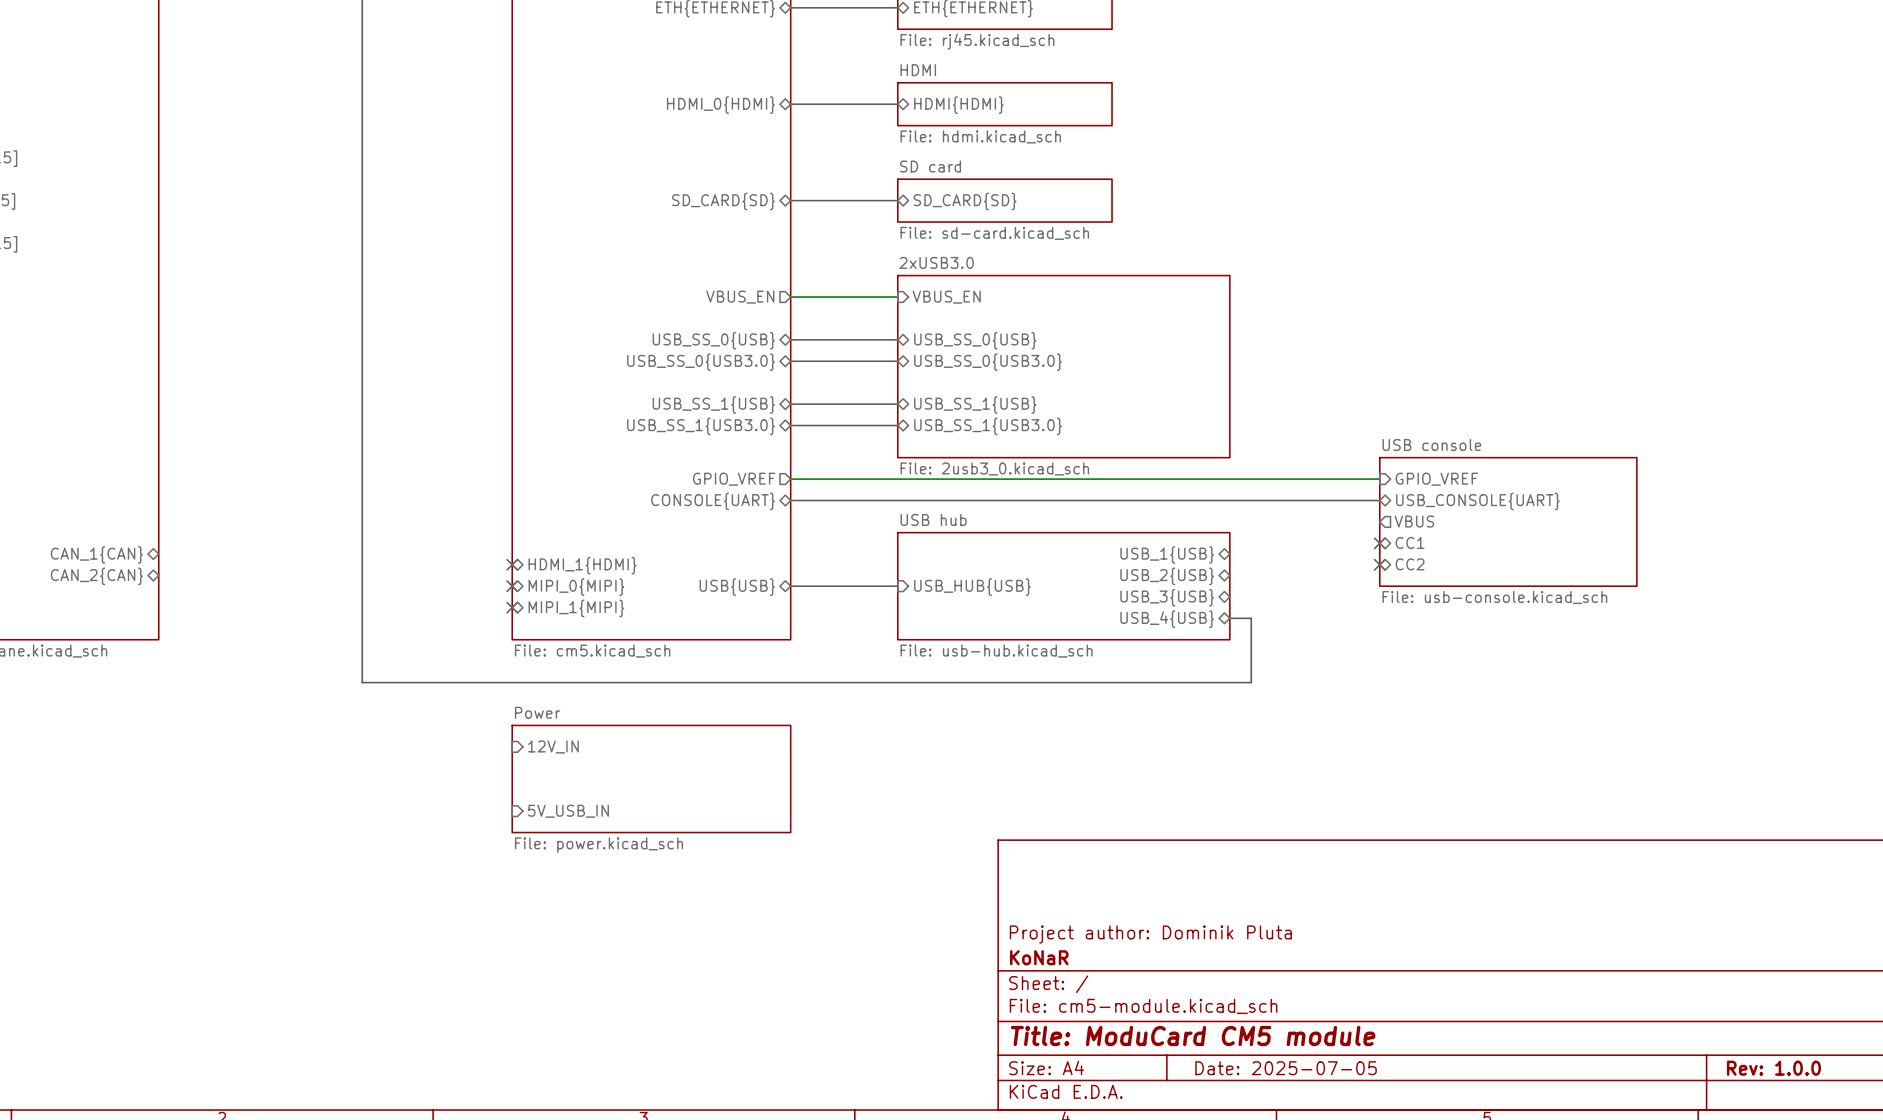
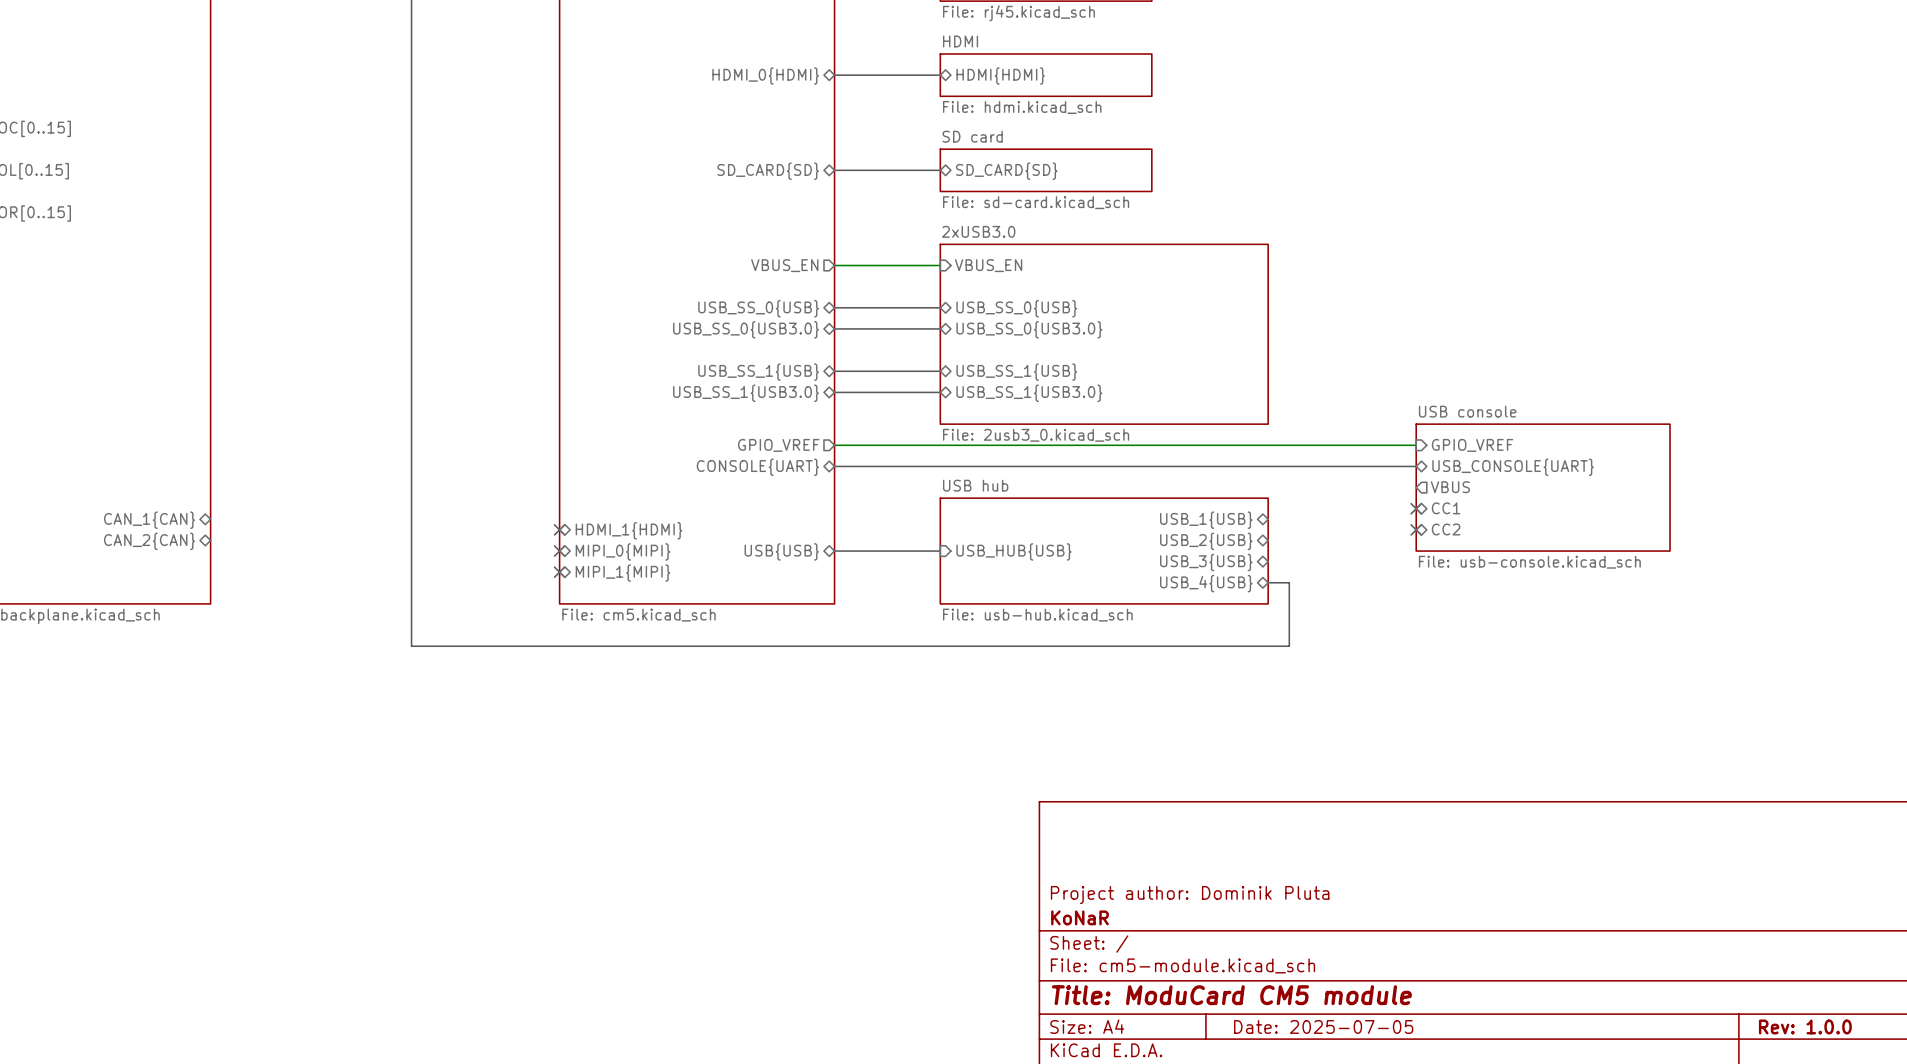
sheet pin: 12V_IN (553, 746) -> none
sheet Power: File: power.kicad_sch (651, 778) -> none
sheet pin: 5V_USB_IN (568, 811) -> none

